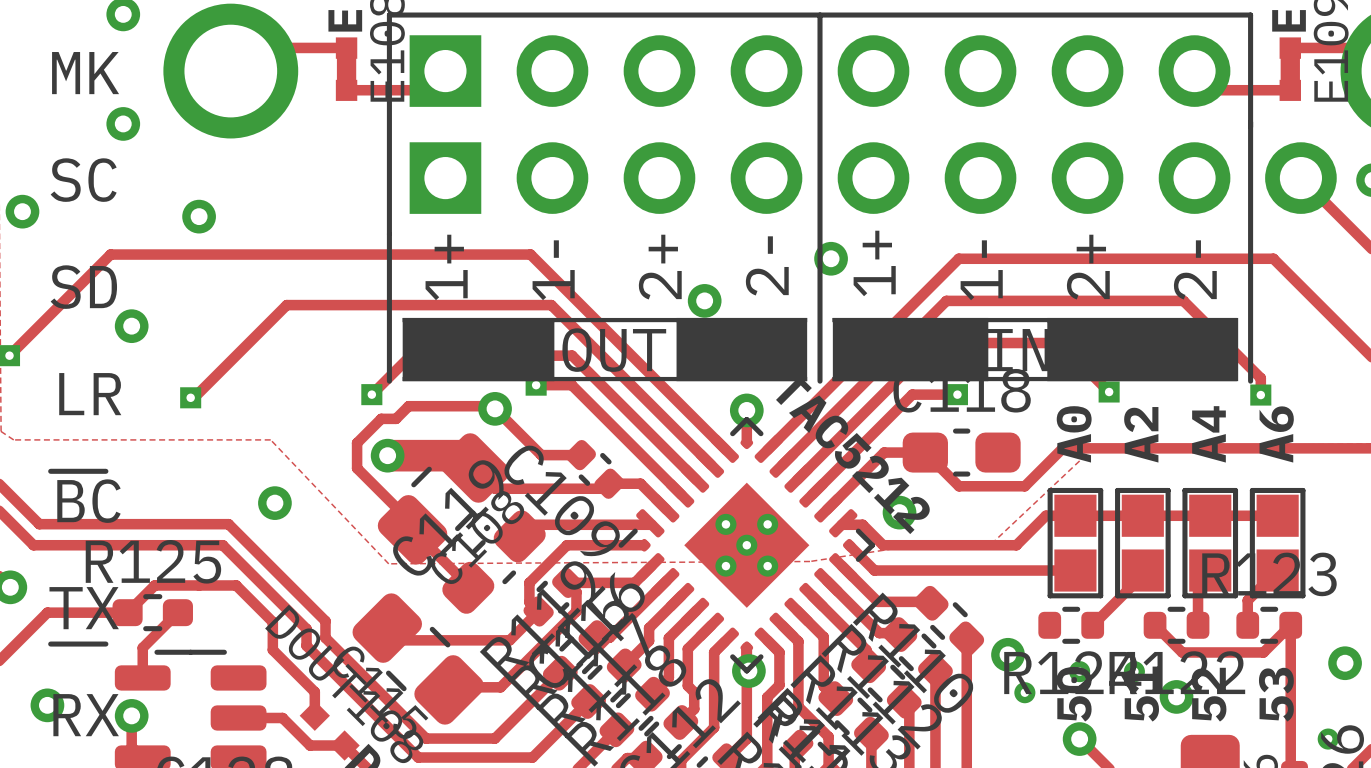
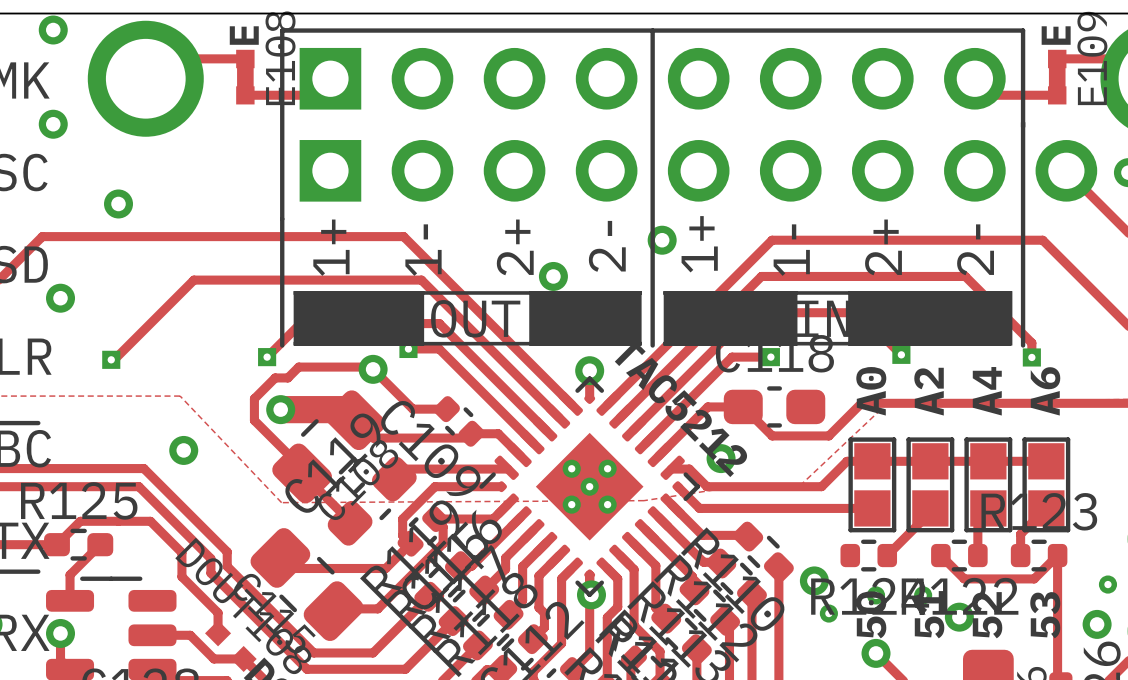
via position: (1345, 663) -> (1097, 624)
part position: (1328, 739) -> (1107, 584)

